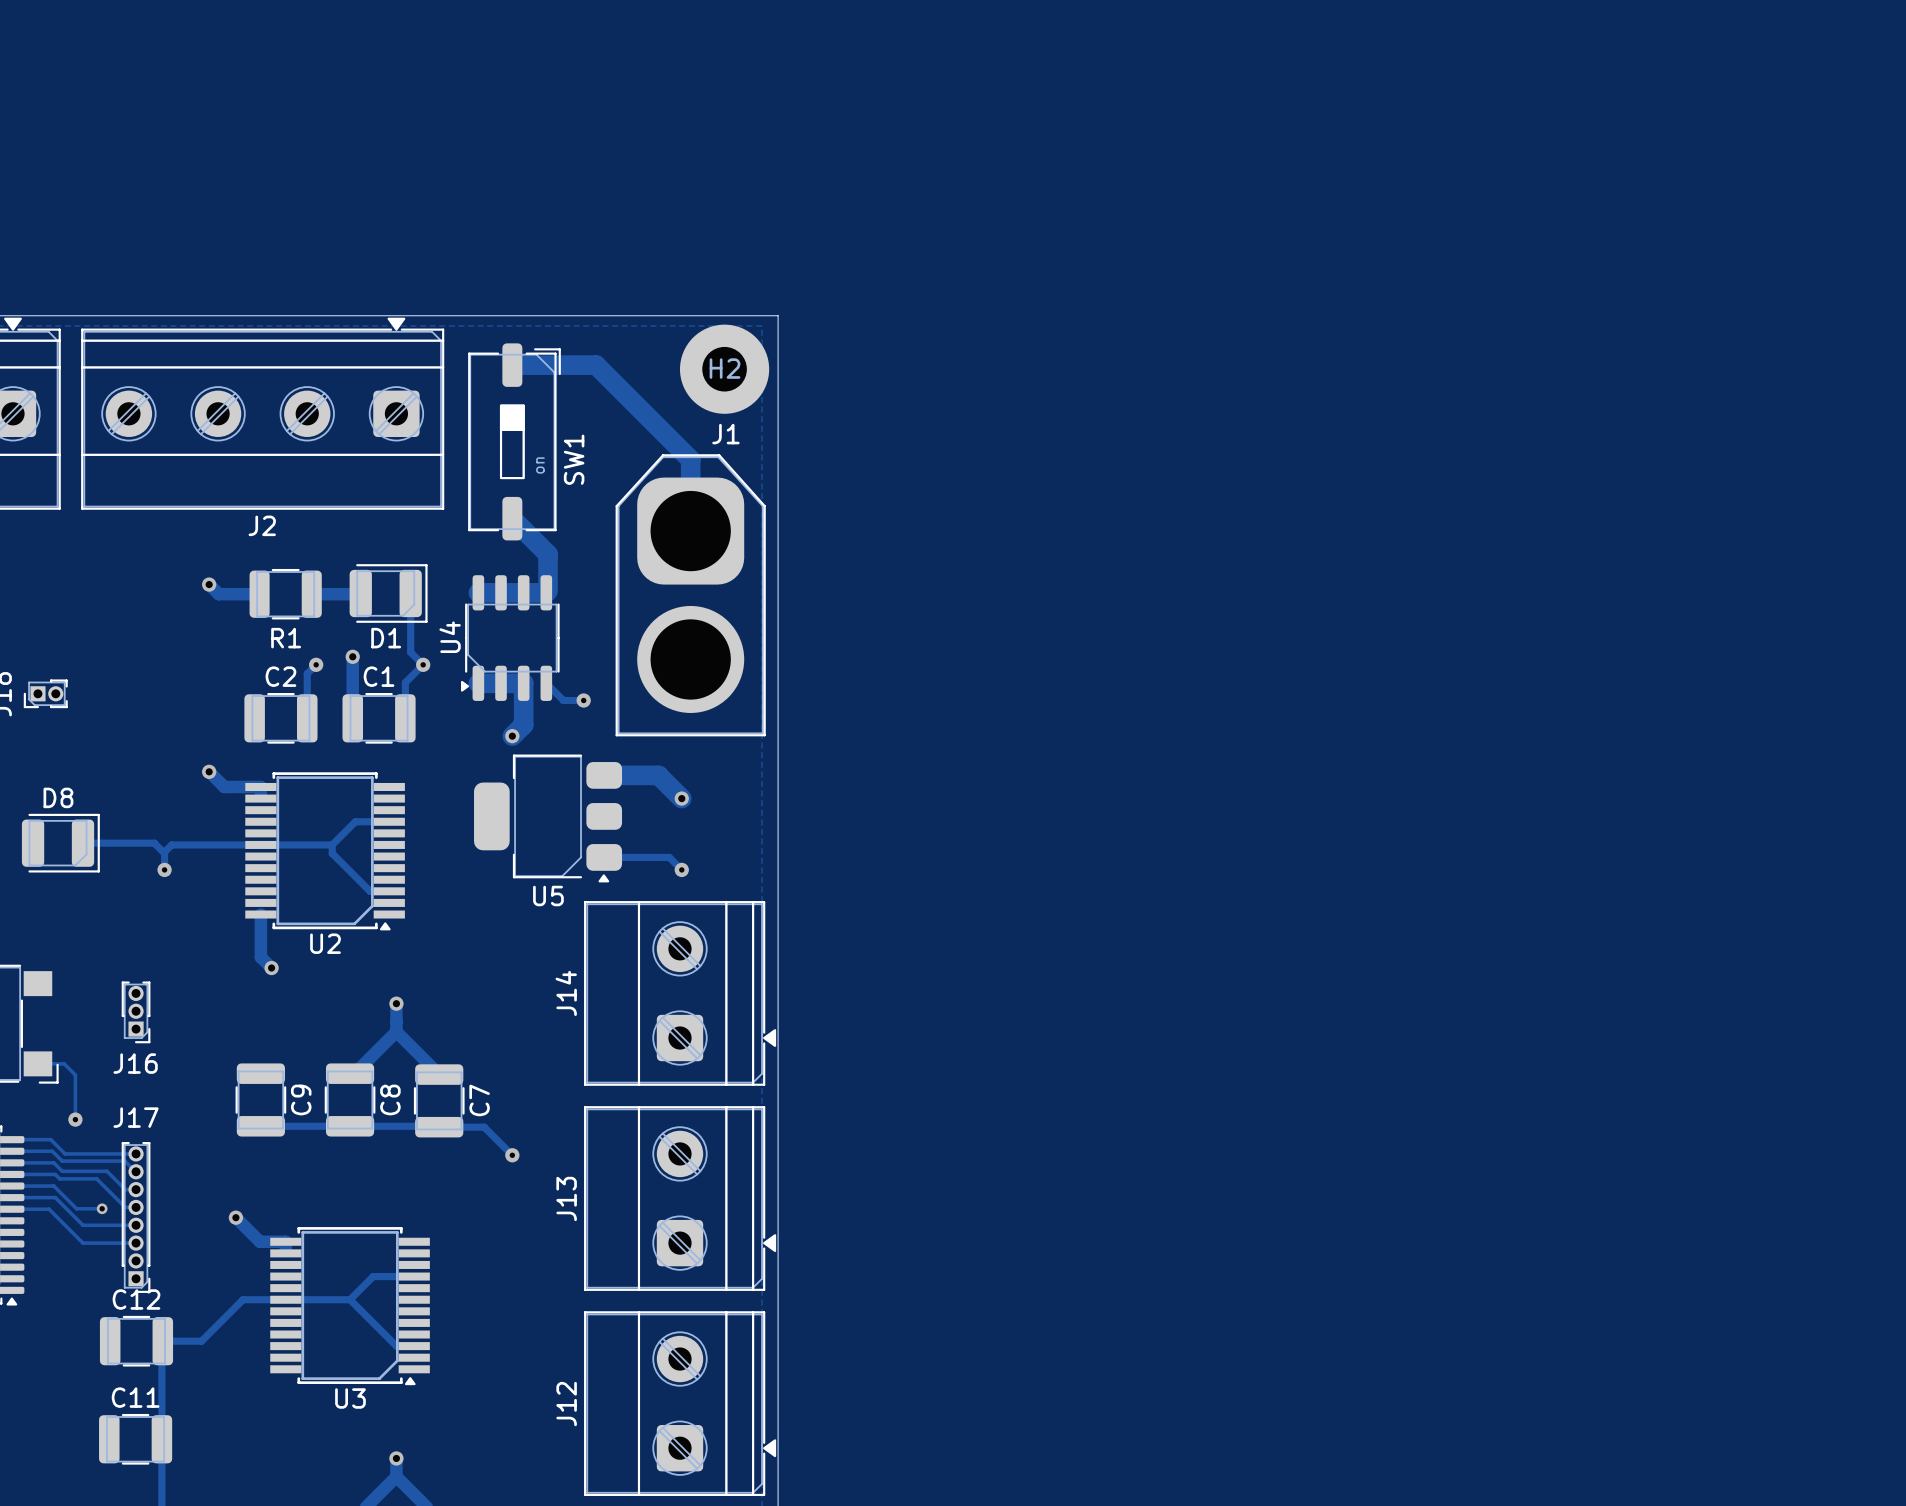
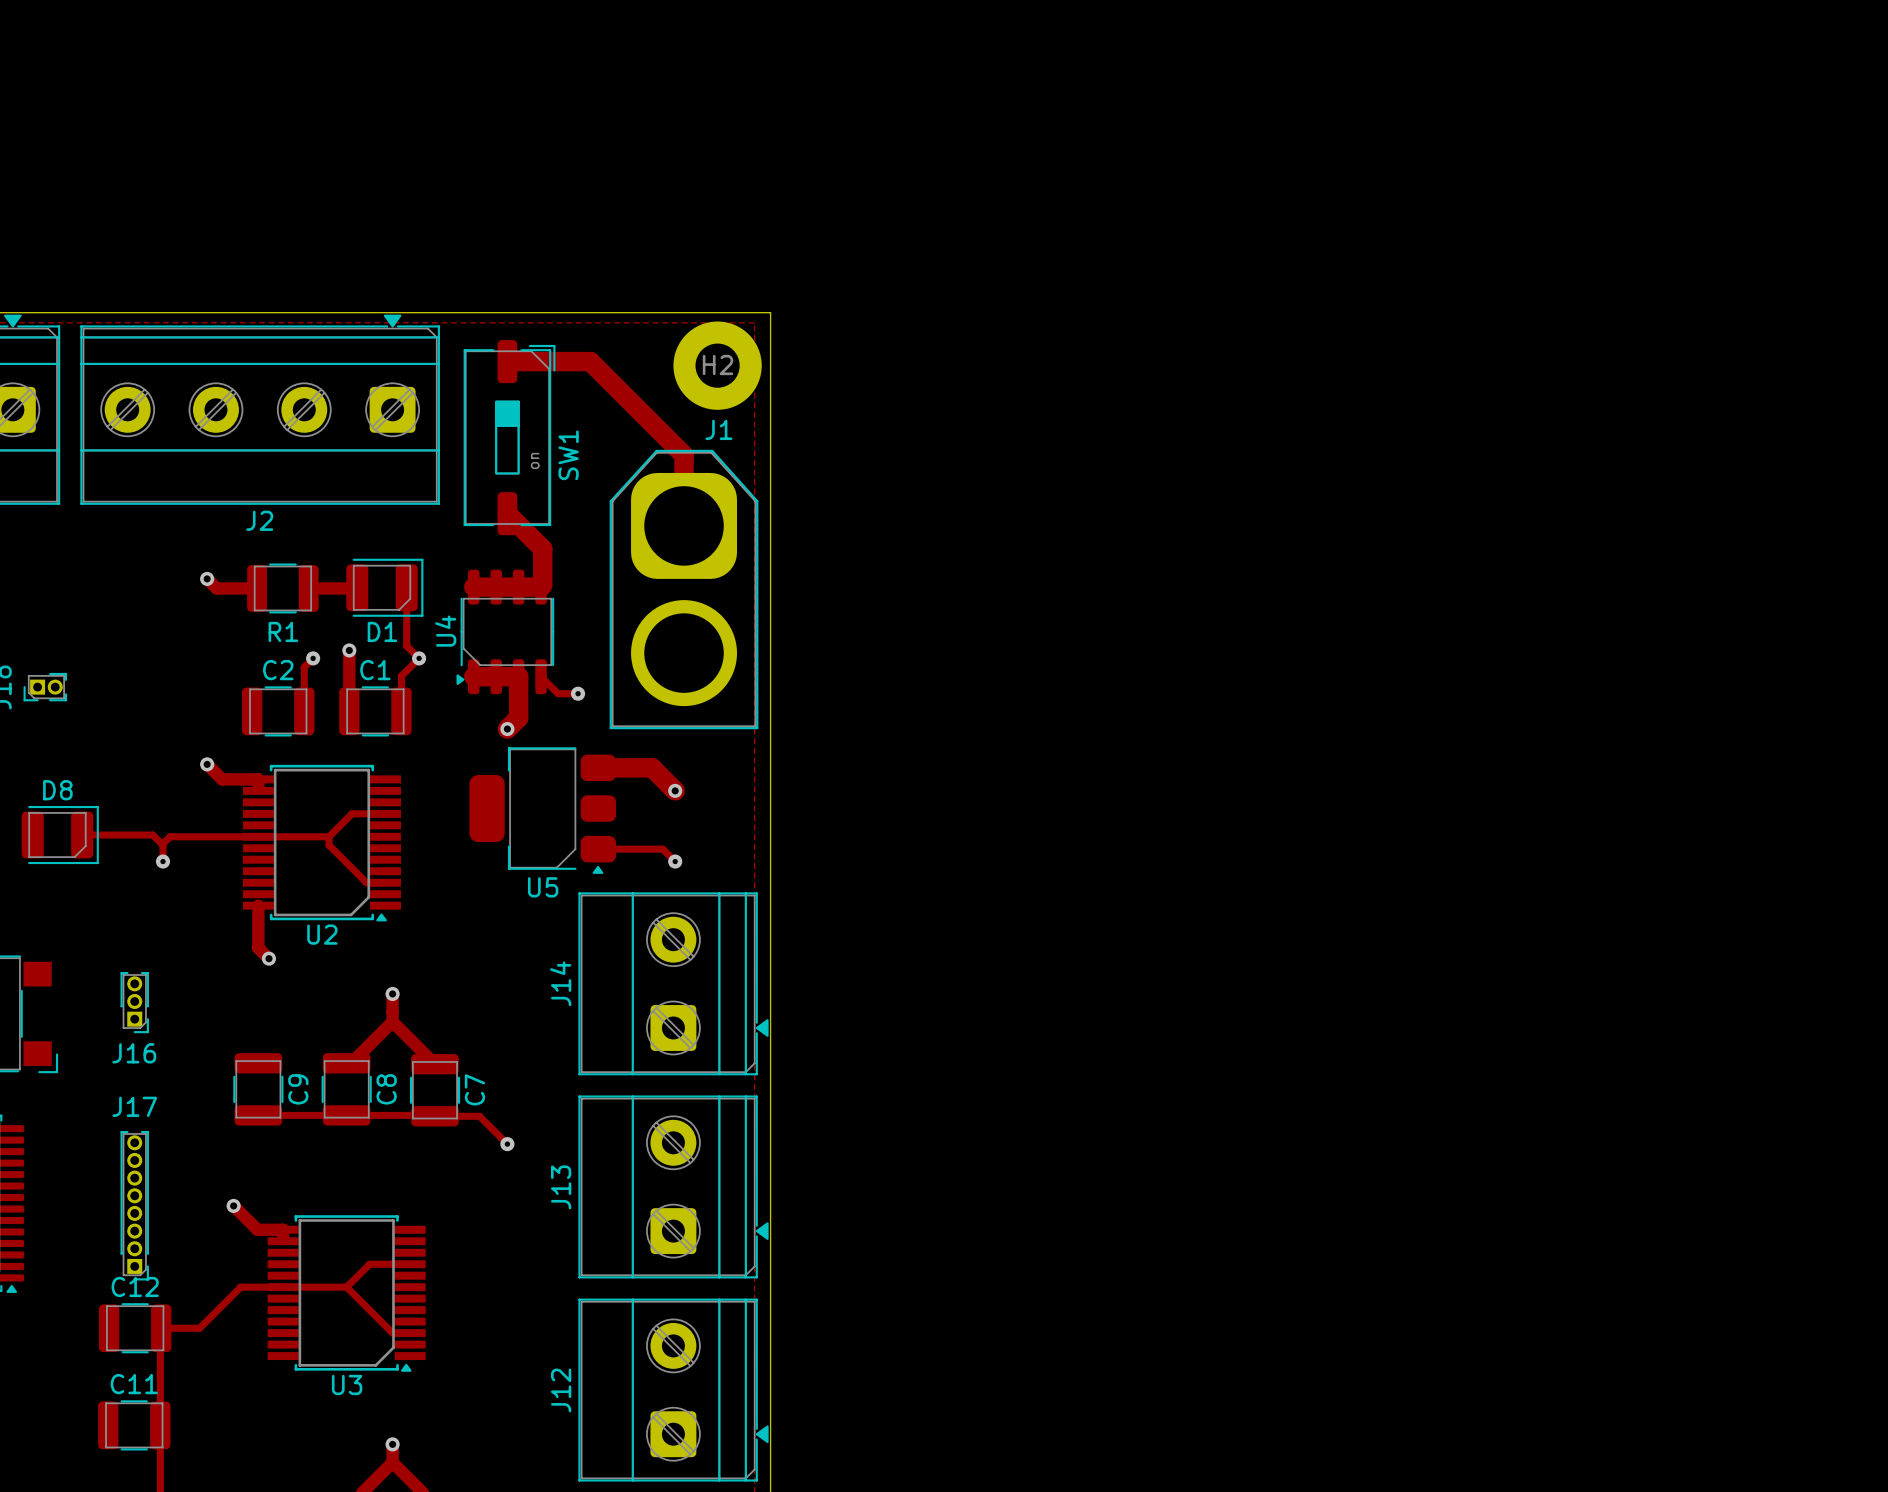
track: (37, 1063) (64, 1063) (75, 1075) (75, 1119) -> none
via: (75, 1119) -> none
track: (11, 1139) (50, 1139) (65, 1153) (136, 1153) -> none
track: (11, 1151) (52, 1151) (62, 1161) (124, 1161) (136, 1171) -> none
track: (11, 1162) (53, 1162) (62, 1171) (107, 1171) (125, 1189) (136, 1189) -> none
track: (11, 1174) (55, 1174) (59, 1178) (96, 1178) (125, 1207) (136, 1207) -> none
track: (11, 1186) (53, 1186) (76, 1208) (102, 1208) -> none
track: (11, 1197) (55, 1197) (82, 1225) (136, 1225) -> none
via: (102, 1208) -> none
track: (11, 1209) (49, 1209) (82, 1243) (136, 1243) -> none

